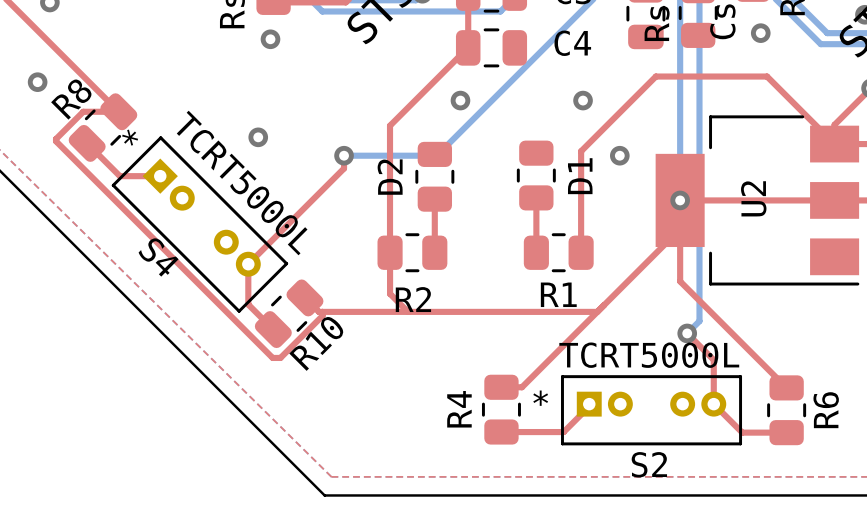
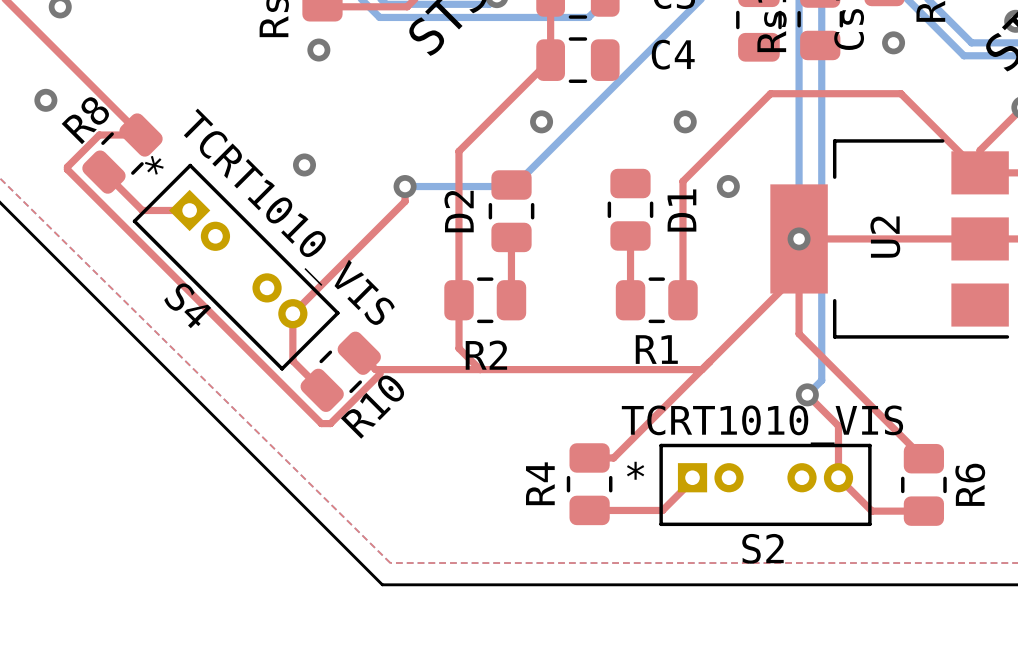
S4 value: TCRT5000L (242, 183) -> TCRT1010_VIS (289, 216)
S2 value: TCRT5000L (649, 355) -> TCRT1010_VIS (762, 424)

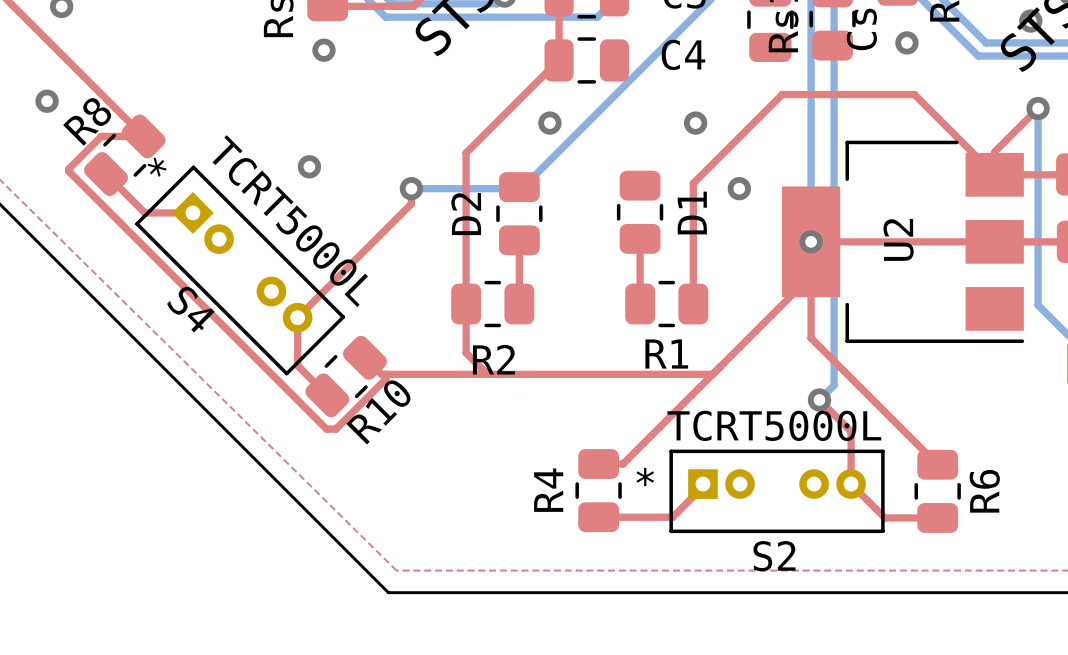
S4 value: TCRT1010_VIS (289, 216) -> TCRT5000L (290, 221)
S2 value: TCRT1010_VIS (762, 424) -> TCRT5000L (774, 425)

